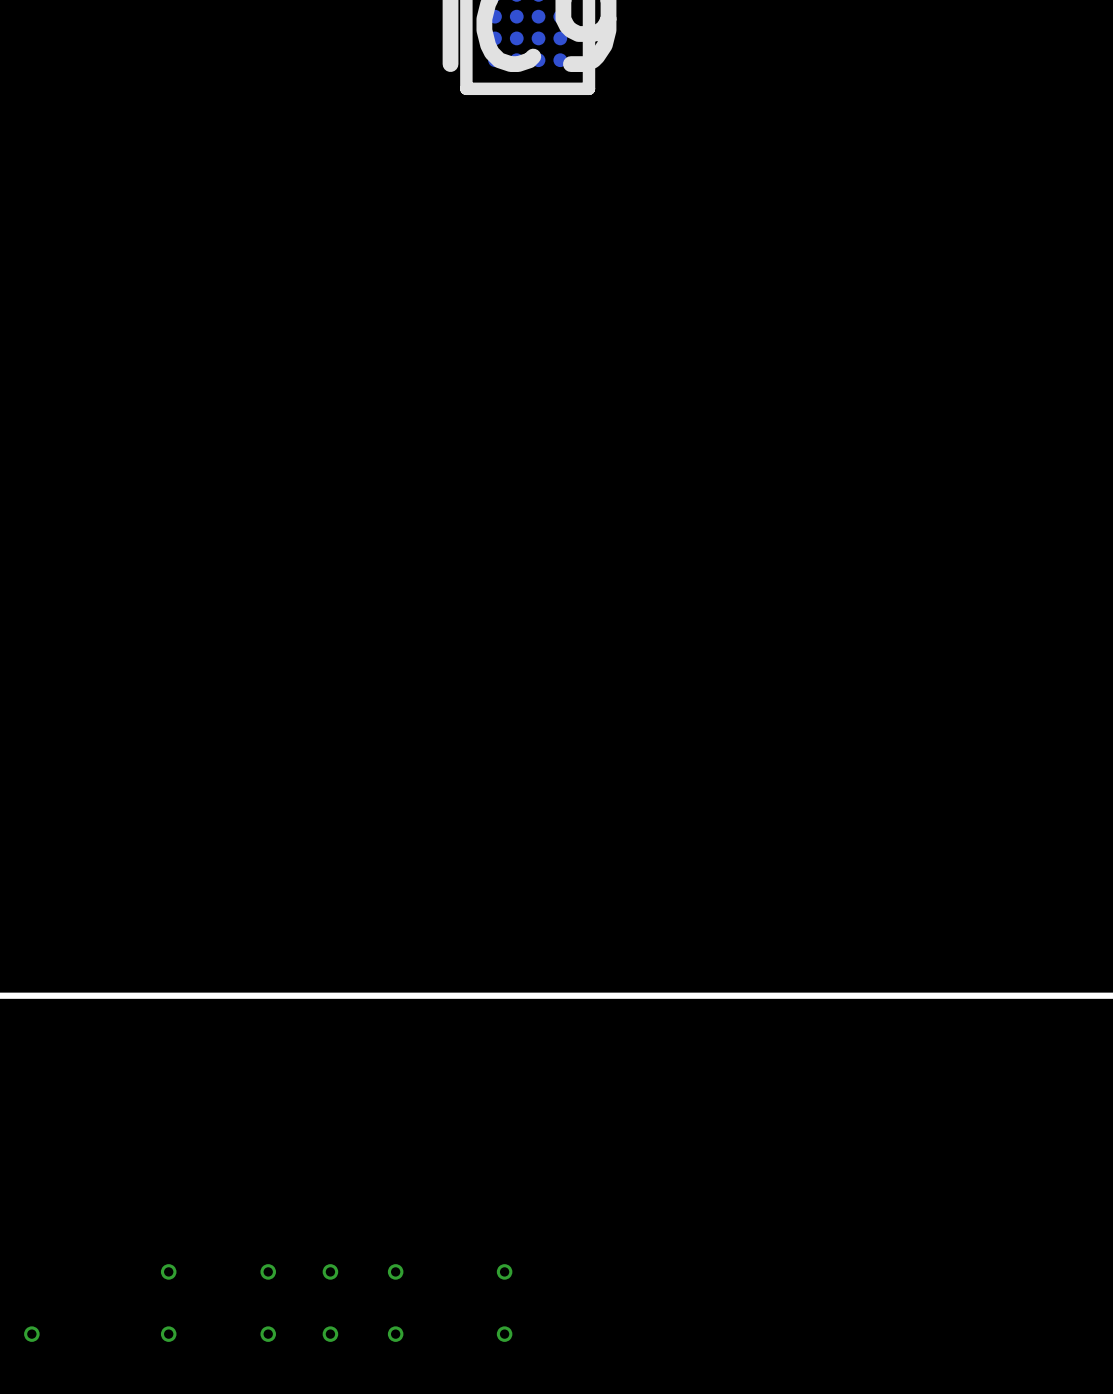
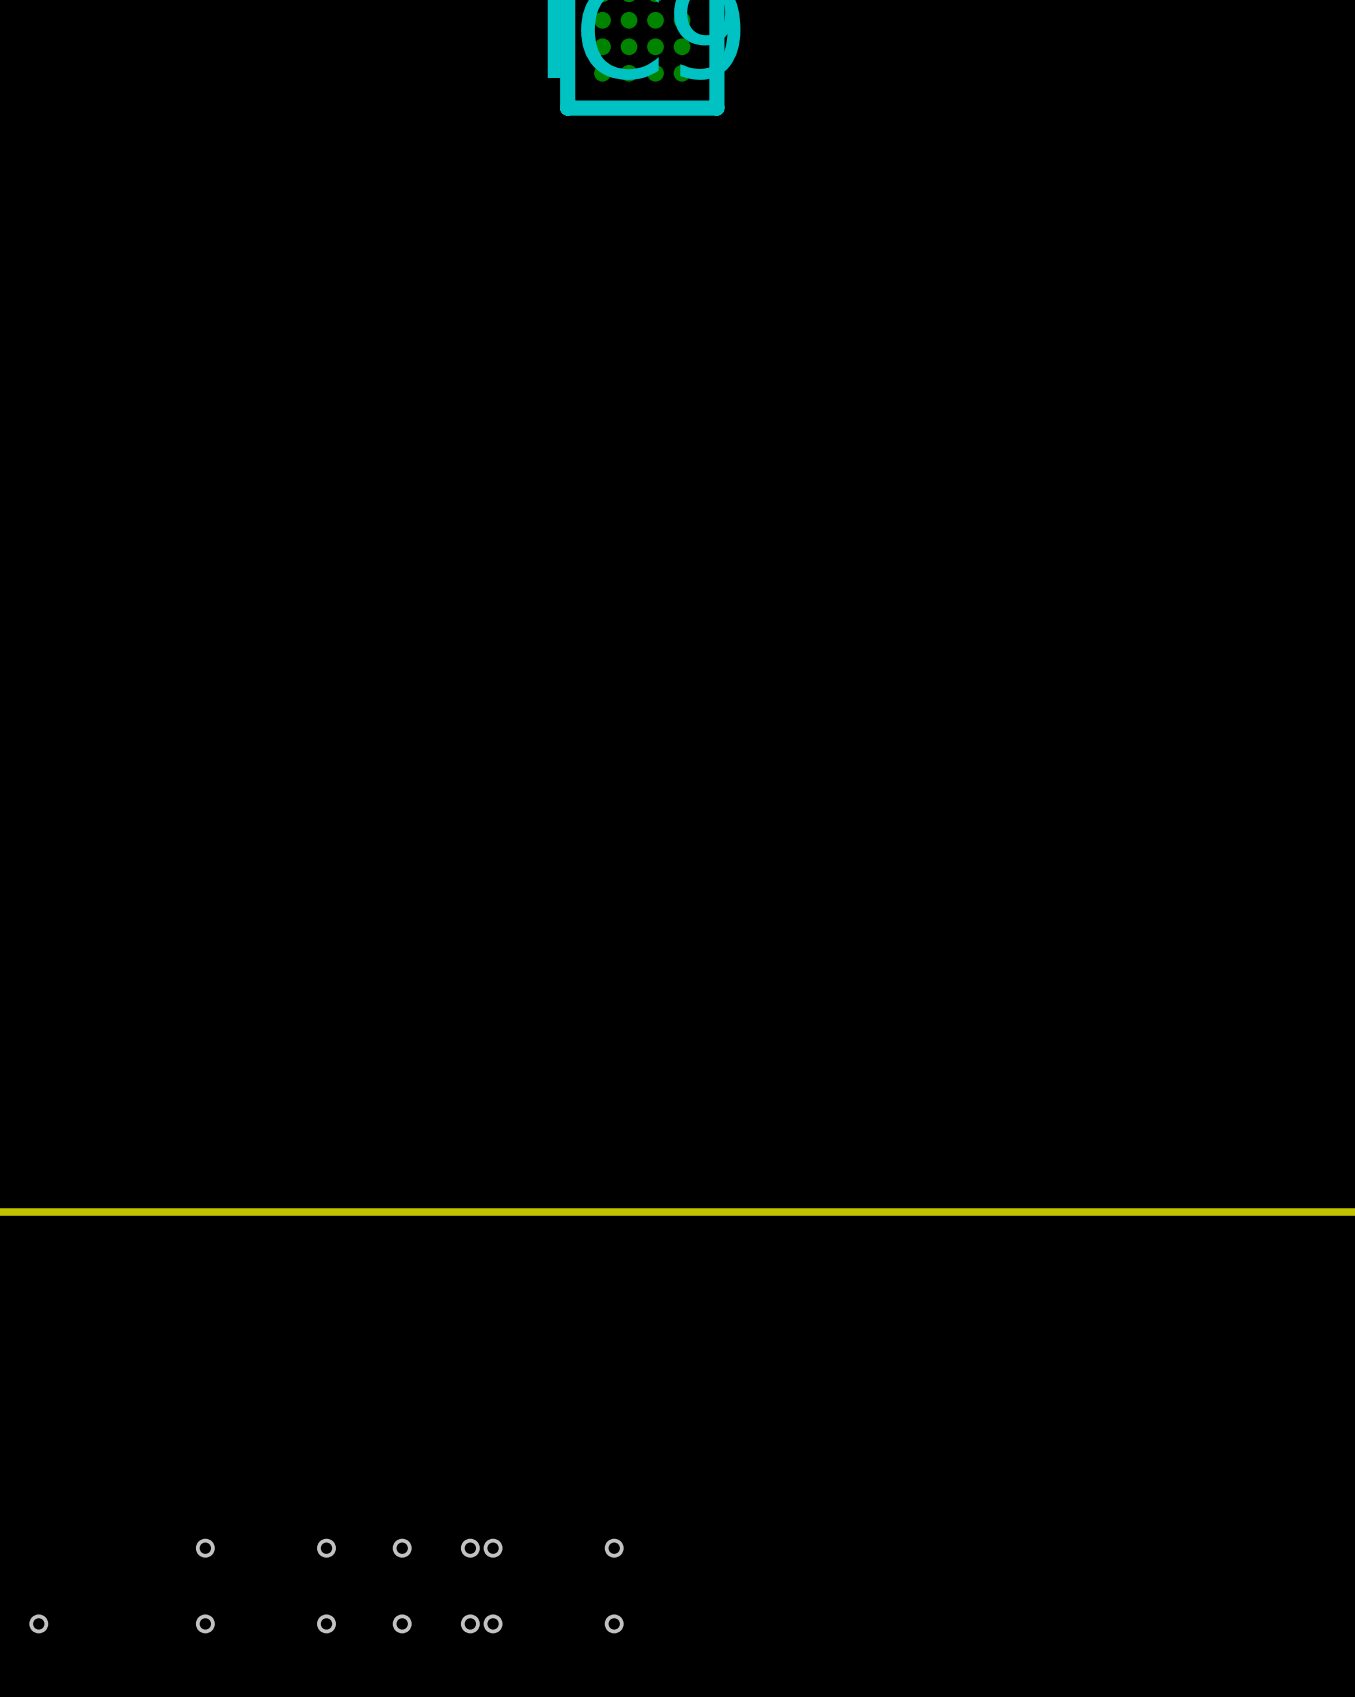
via: none -> (470, 1548)
via: (395, 1271) -> none
via: none -> (493, 1548)
via: none -> (470, 1623)
via: (395, 1334) -> none
via: none -> (493, 1623)

